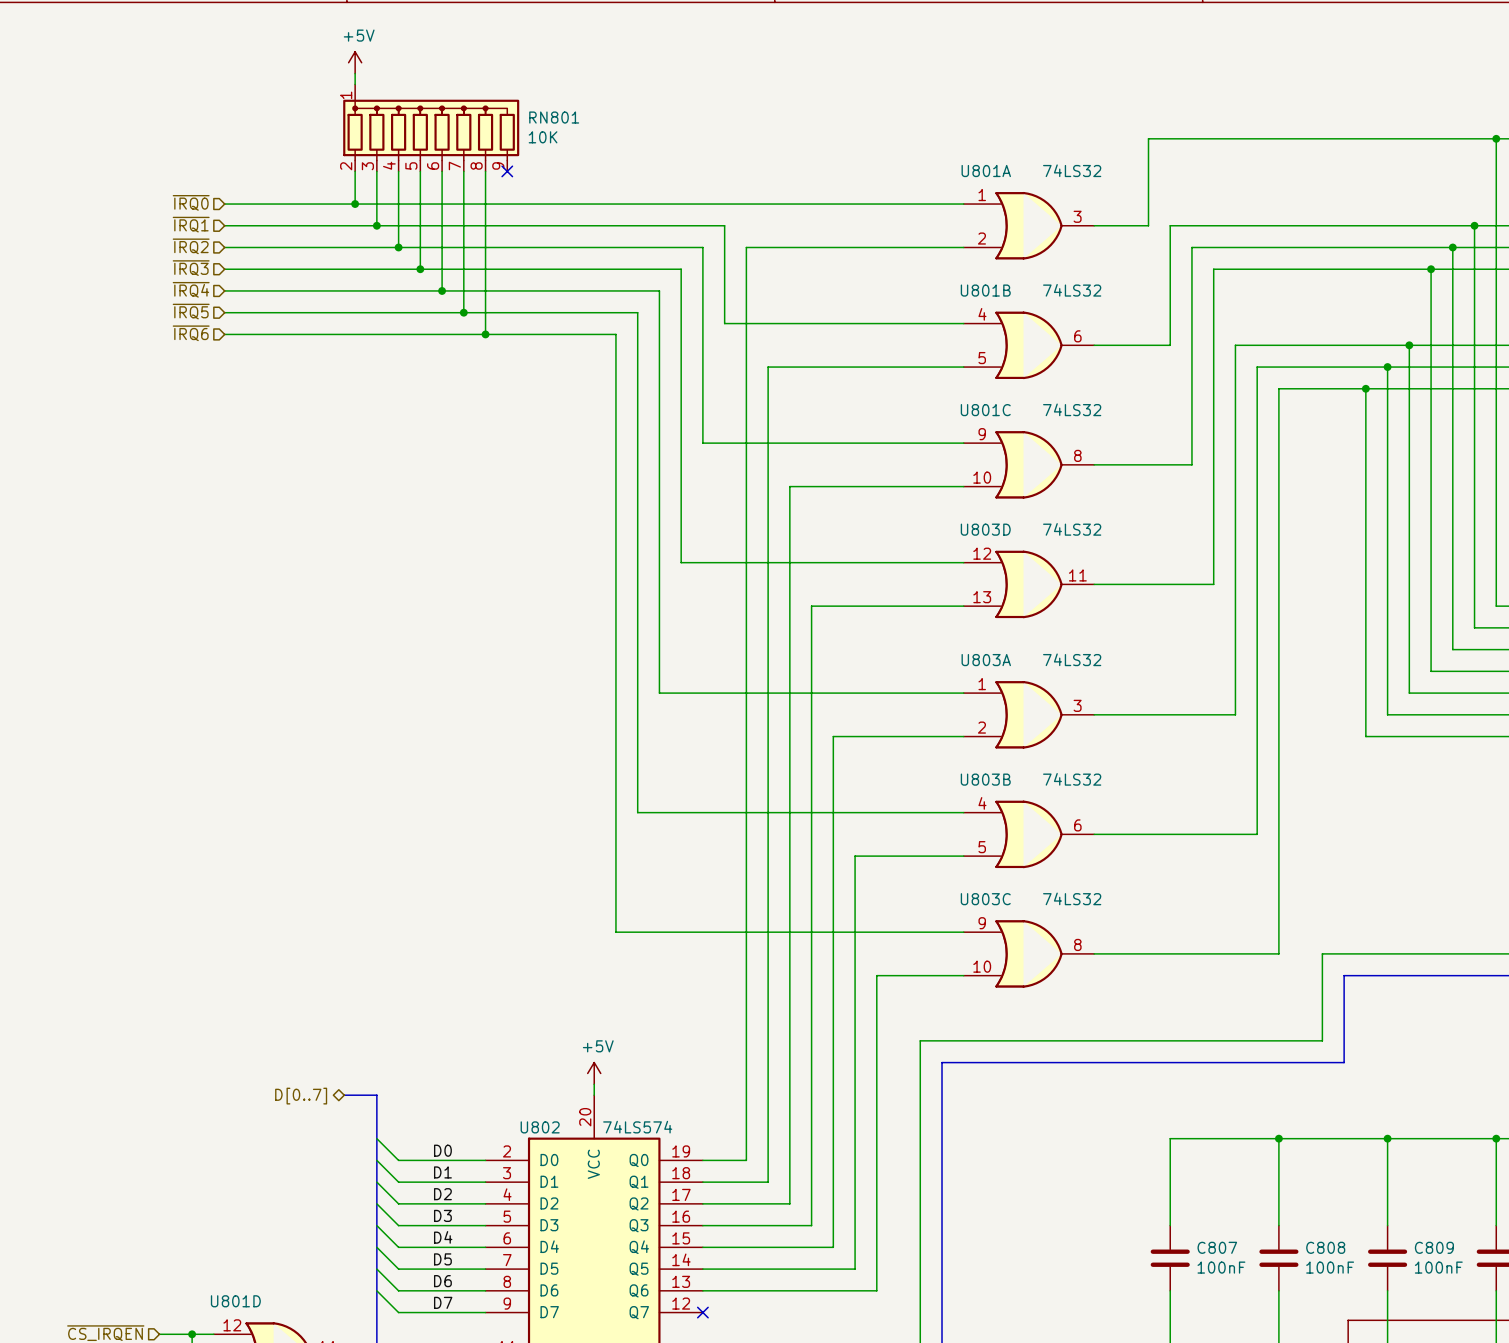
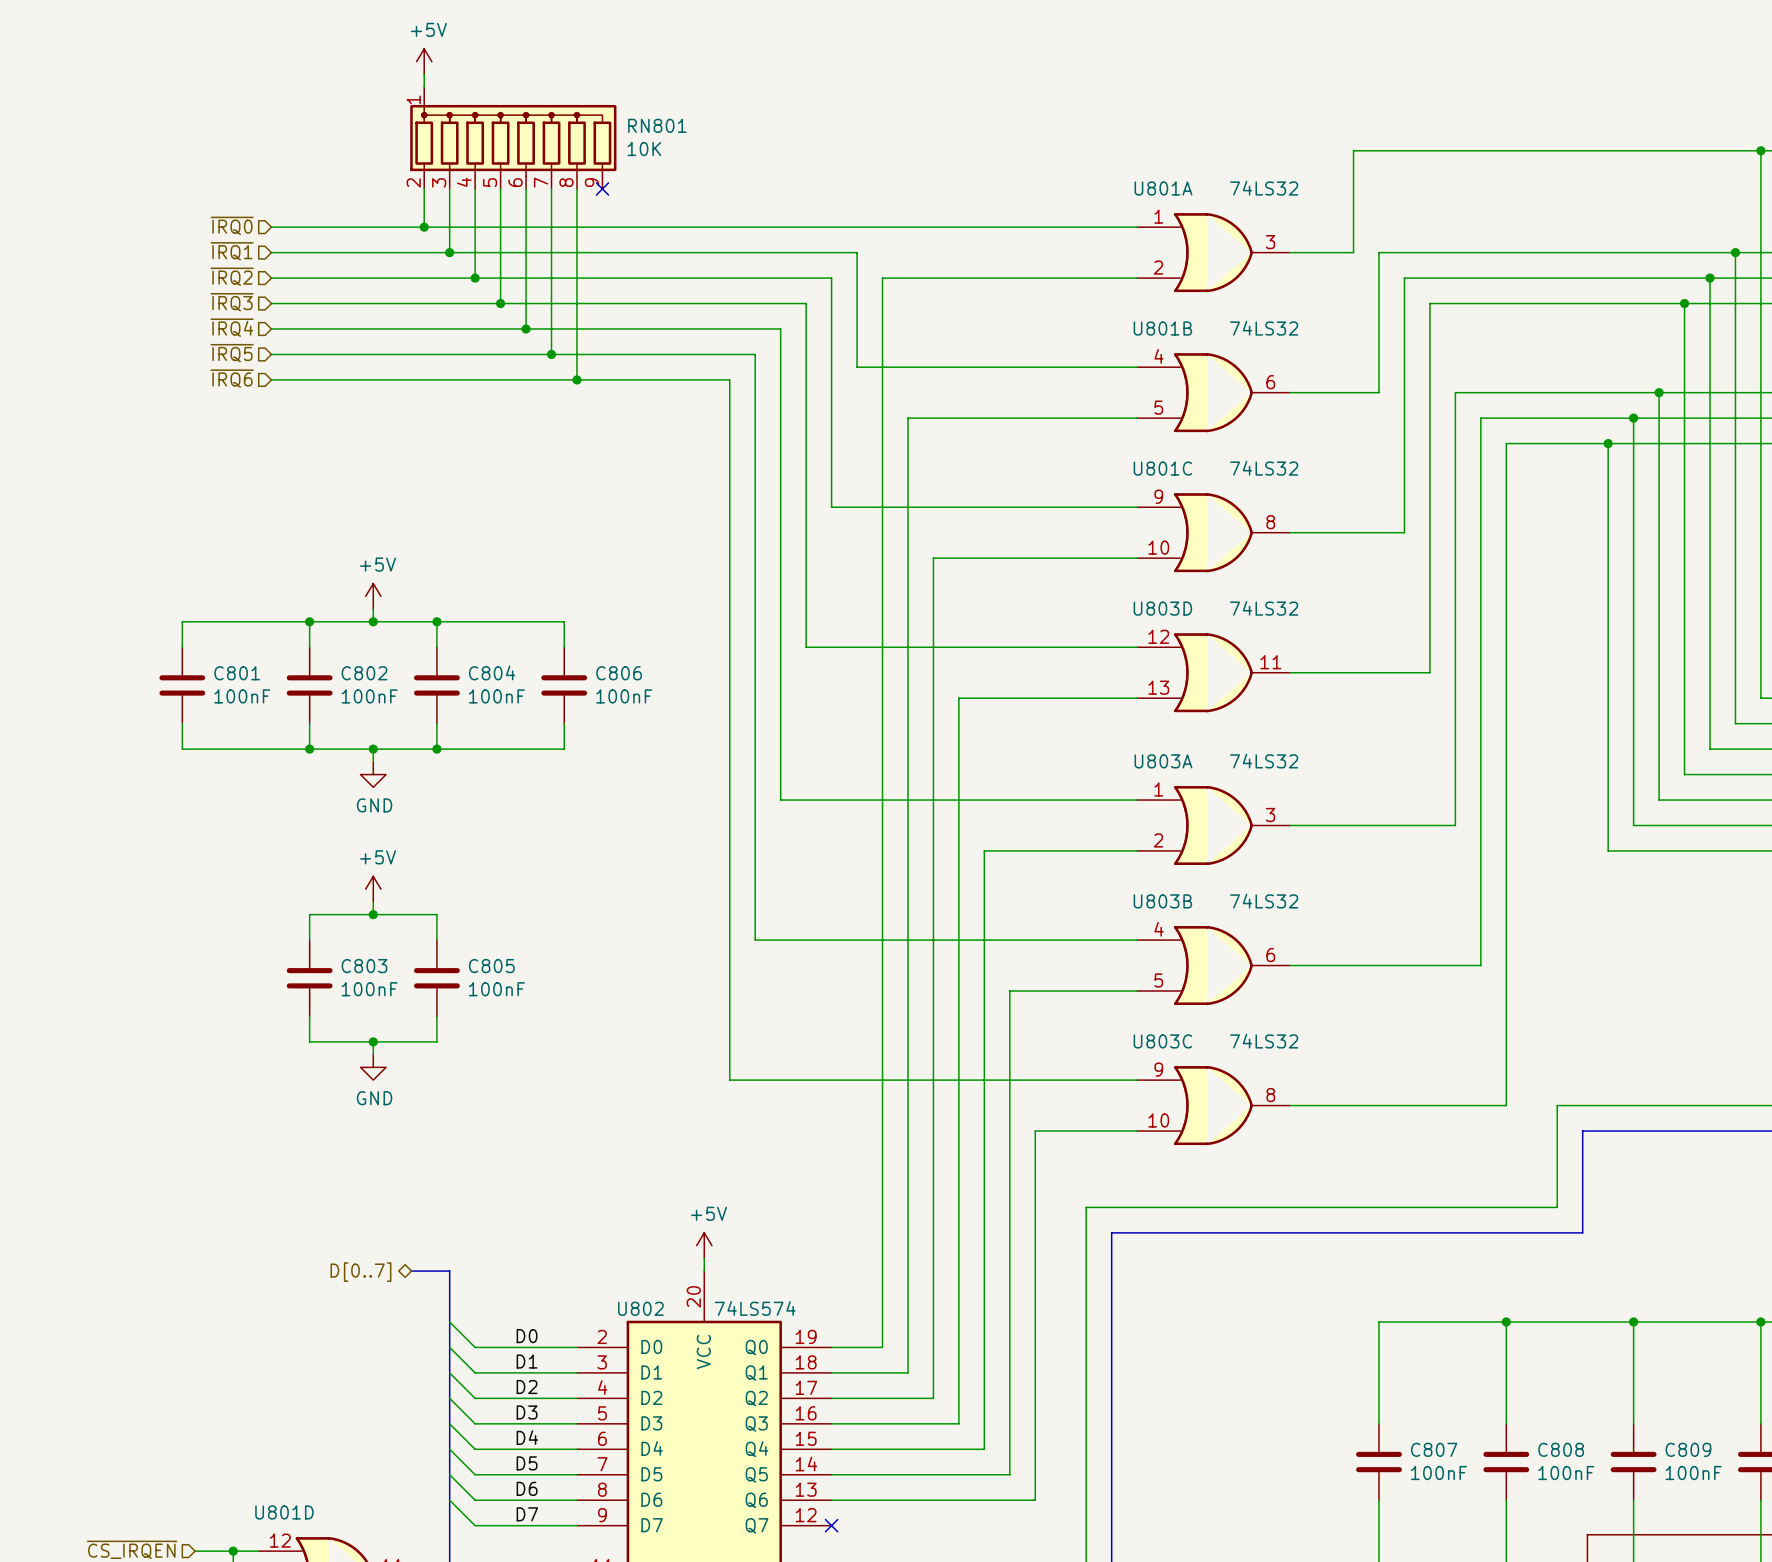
power symbol: none -> +5V (373, 596)
wire: none -> (373, 609) (373, 621)
wire: none -> (309, 621) (309, 647)
junction: none -> (309, 621)
junction: none -> (373, 621)
wire: none -> (436, 621) (436, 647)
junction: none -> (436, 621)
wire: none -> (182, 647) (182, 621) (564, 621) (564, 647)
C801: none -> 100nF (182, 685)
C802: none -> 100nF (309, 685)
C804: none -> 100nF (436, 685)
C806: none -> 100nF (564, 685)
wire: none -> (182, 723) (182, 749) (564, 749) (564, 723)
wire: none -> (309, 723) (309, 749)
wire: none -> (436, 723) (436, 749)
junction: none -> (309, 749)
wire: none -> (373, 749) (373, 761)
junction: none -> (373, 749)
junction: none -> (436, 749)
power symbol: none -> GND (373, 774)
power symbol: none -> +5V (373, 889)
wire: none -> (373, 901) (373, 914)
junction: none -> (373, 914)
wire: none -> (309, 940) (309, 914) (436, 914) (436, 940)
C803: none -> 100nF (309, 978)
C805: none -> 100nF (436, 978)
wire: none -> (309, 1016) (309, 1041) (436, 1041) (436, 1016)
wire: none -> (373, 1041) (373, 1054)
junction: none -> (373, 1041)
power symbol: none -> GND (373, 1067)

